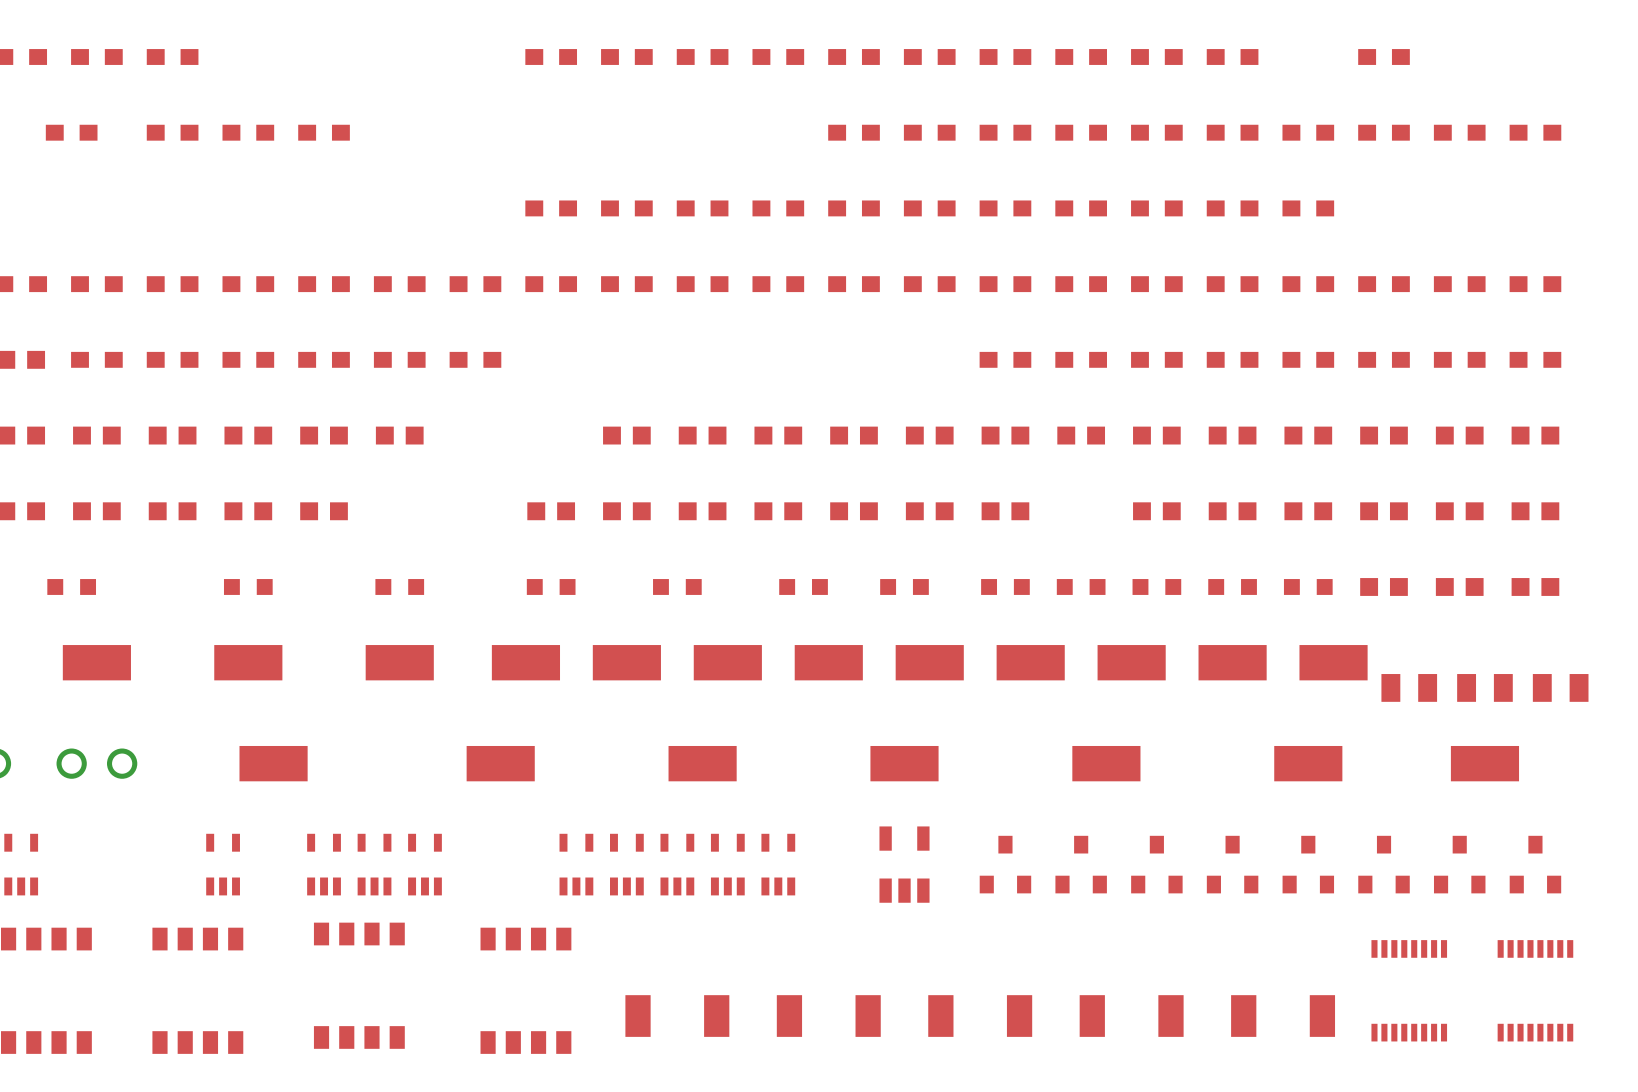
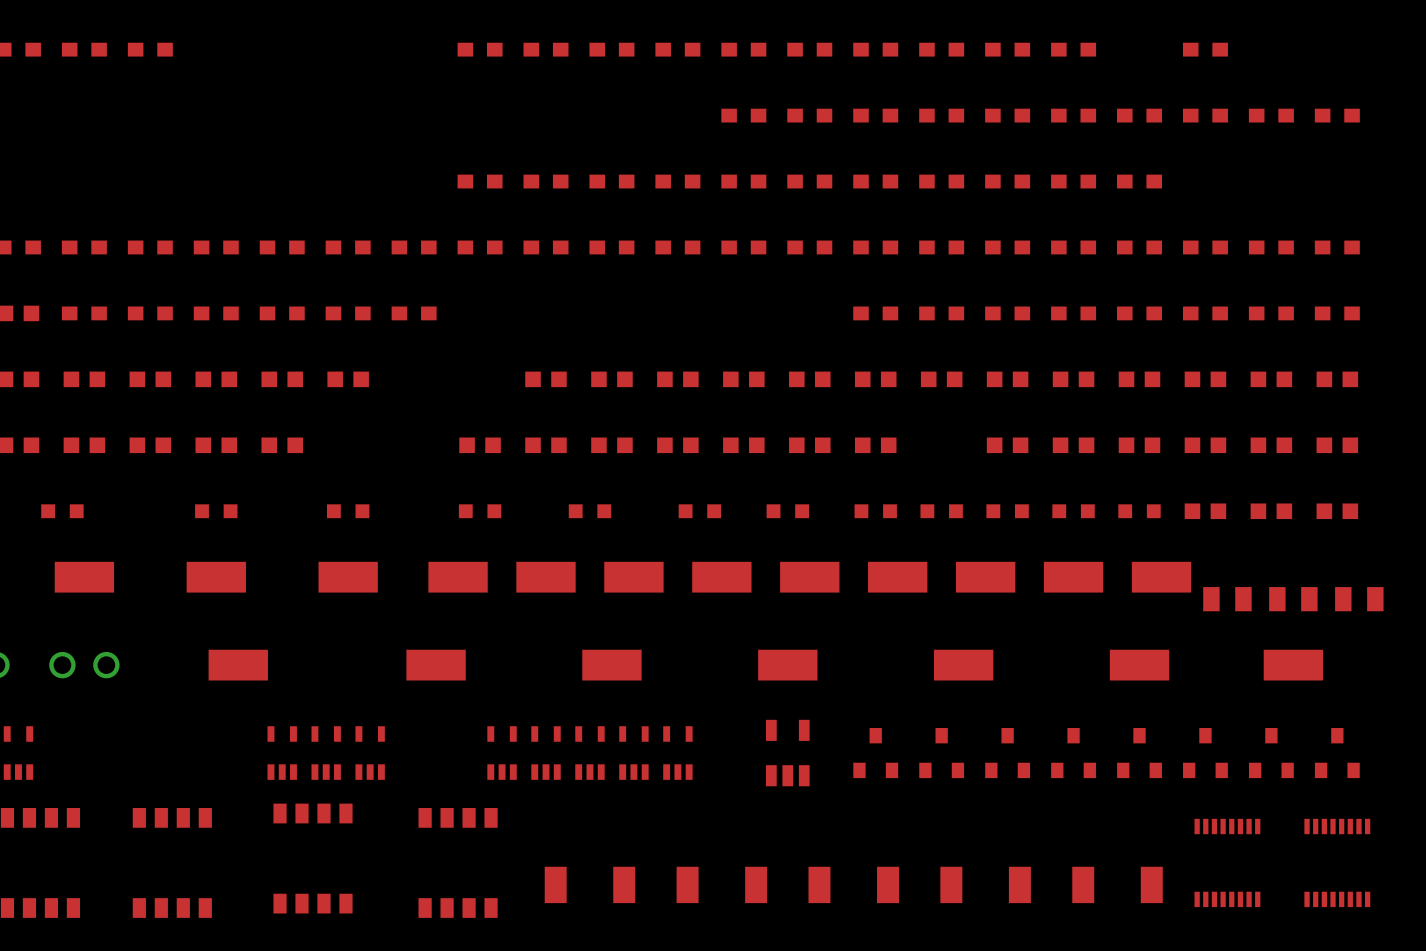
part: (71, 132) -> none
part: (172, 132) -> none
part: (248, 132) -> none
part: (324, 132) -> none
part: (223, 864) -> none

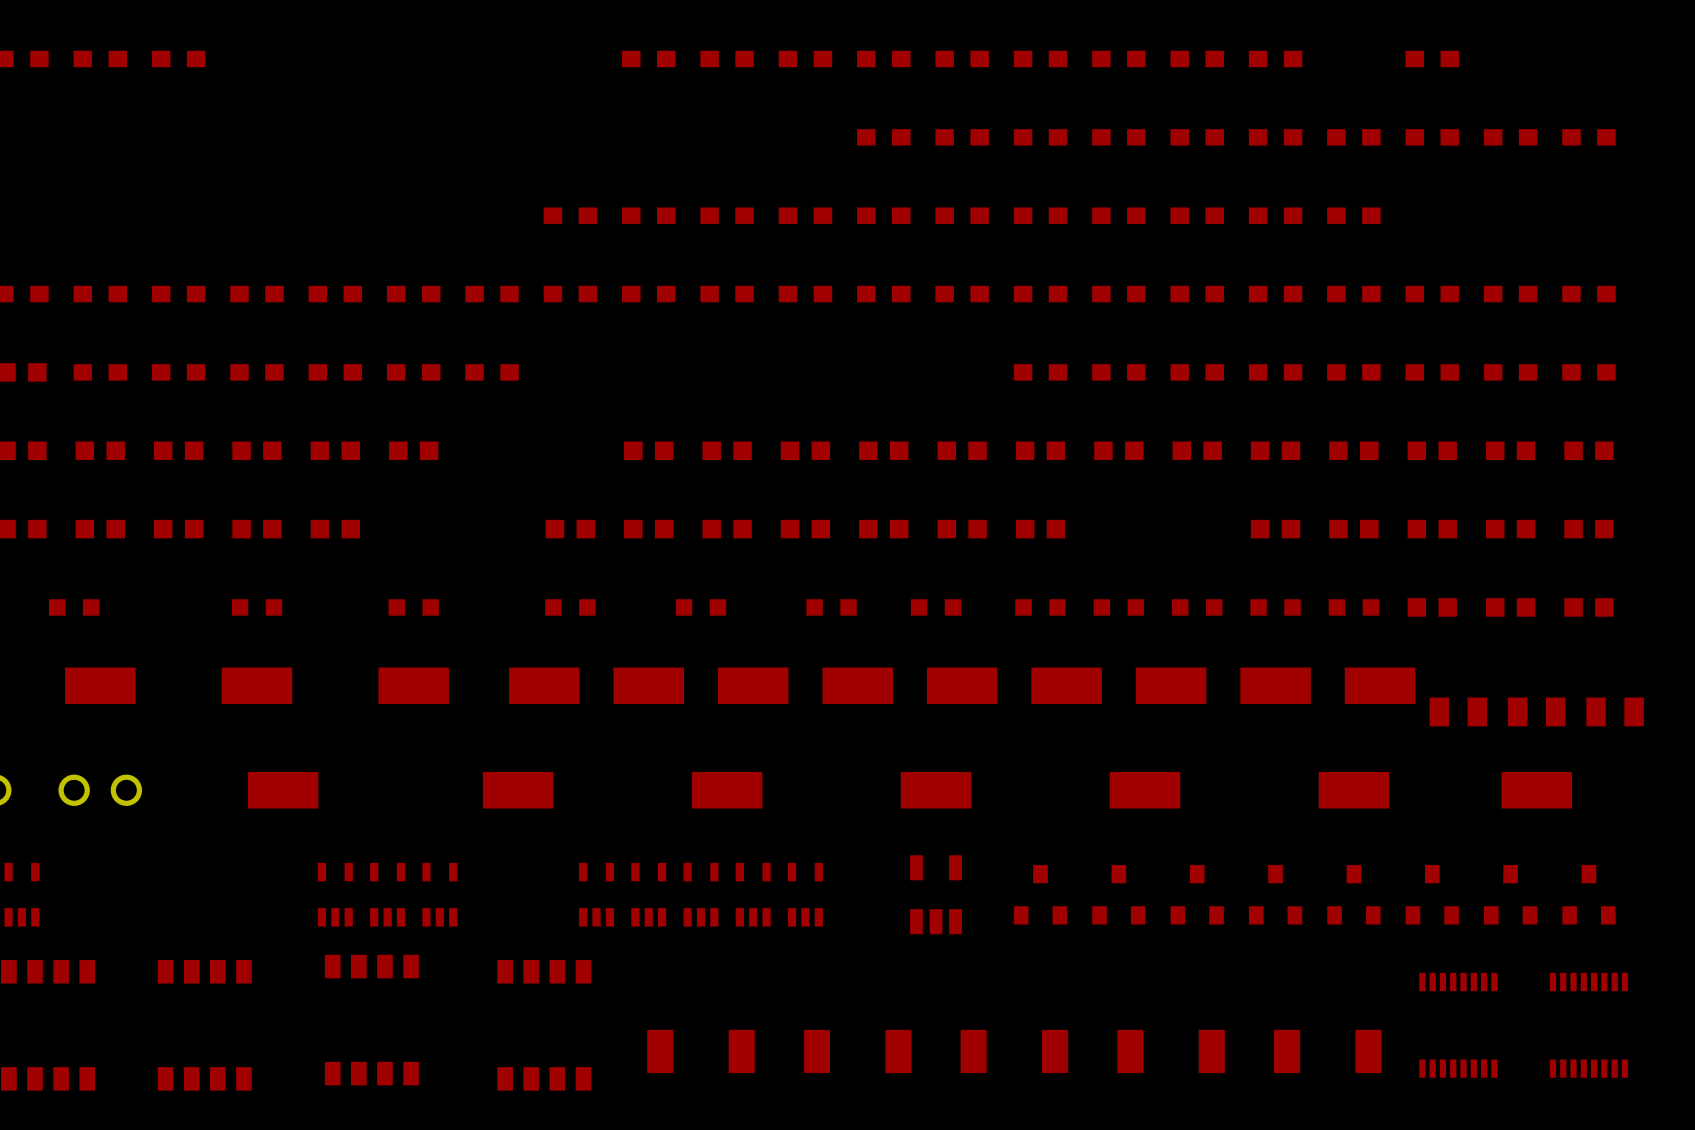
part: (480, 49) -> none
part: (1007, 445) -> none

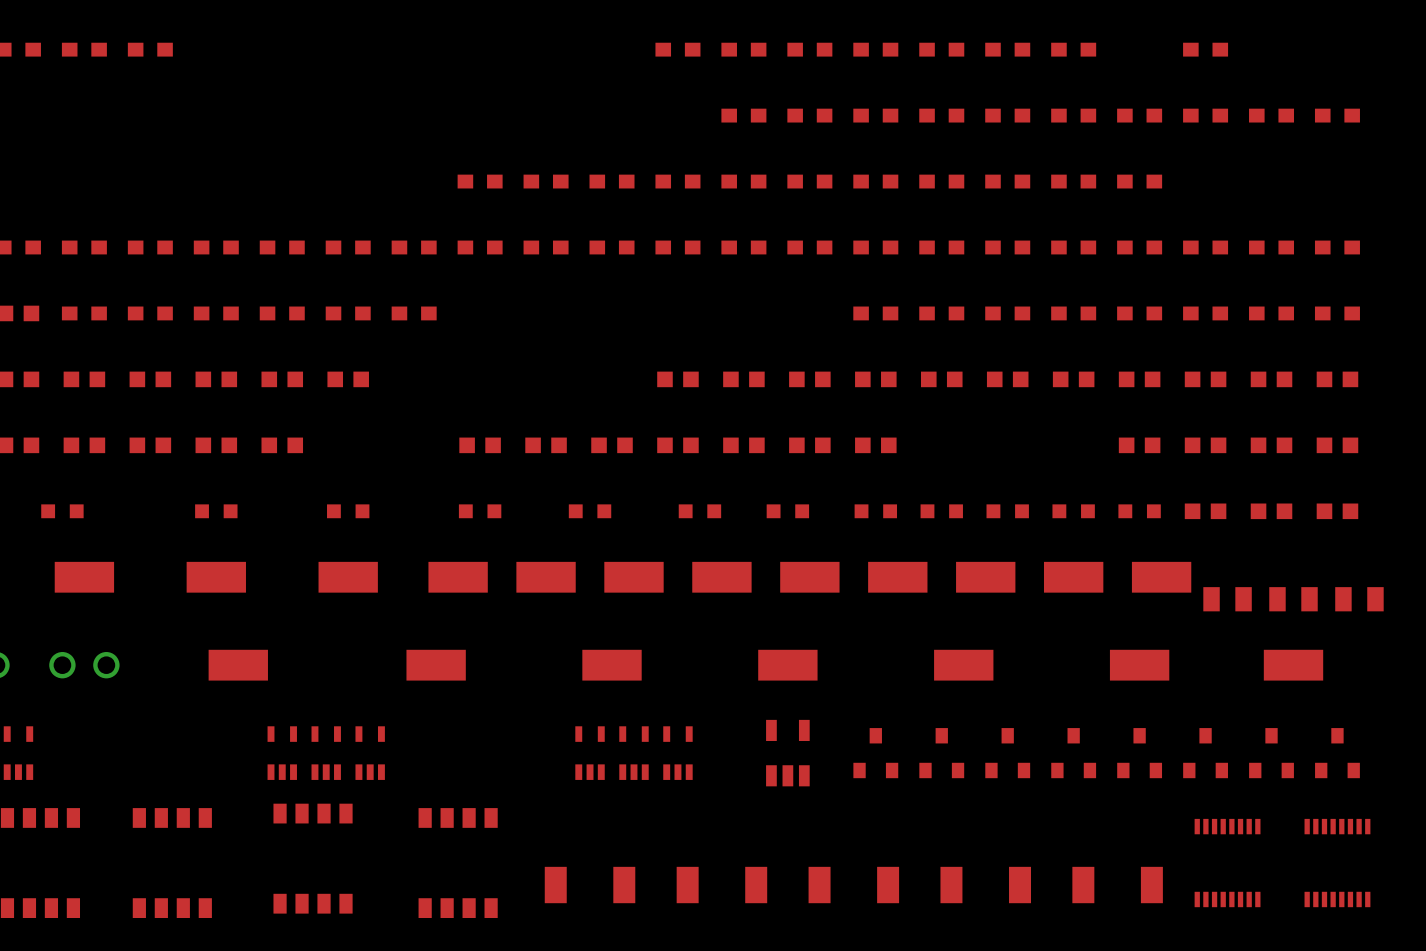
part: (648, 58) -> none
part: (727, 58) -> none
part: (648, 450) -> none
part: (727, 450) -> none
part: (1275, 529) -> none
part: (596, 894) -> none
part: (648, 894) -> none

